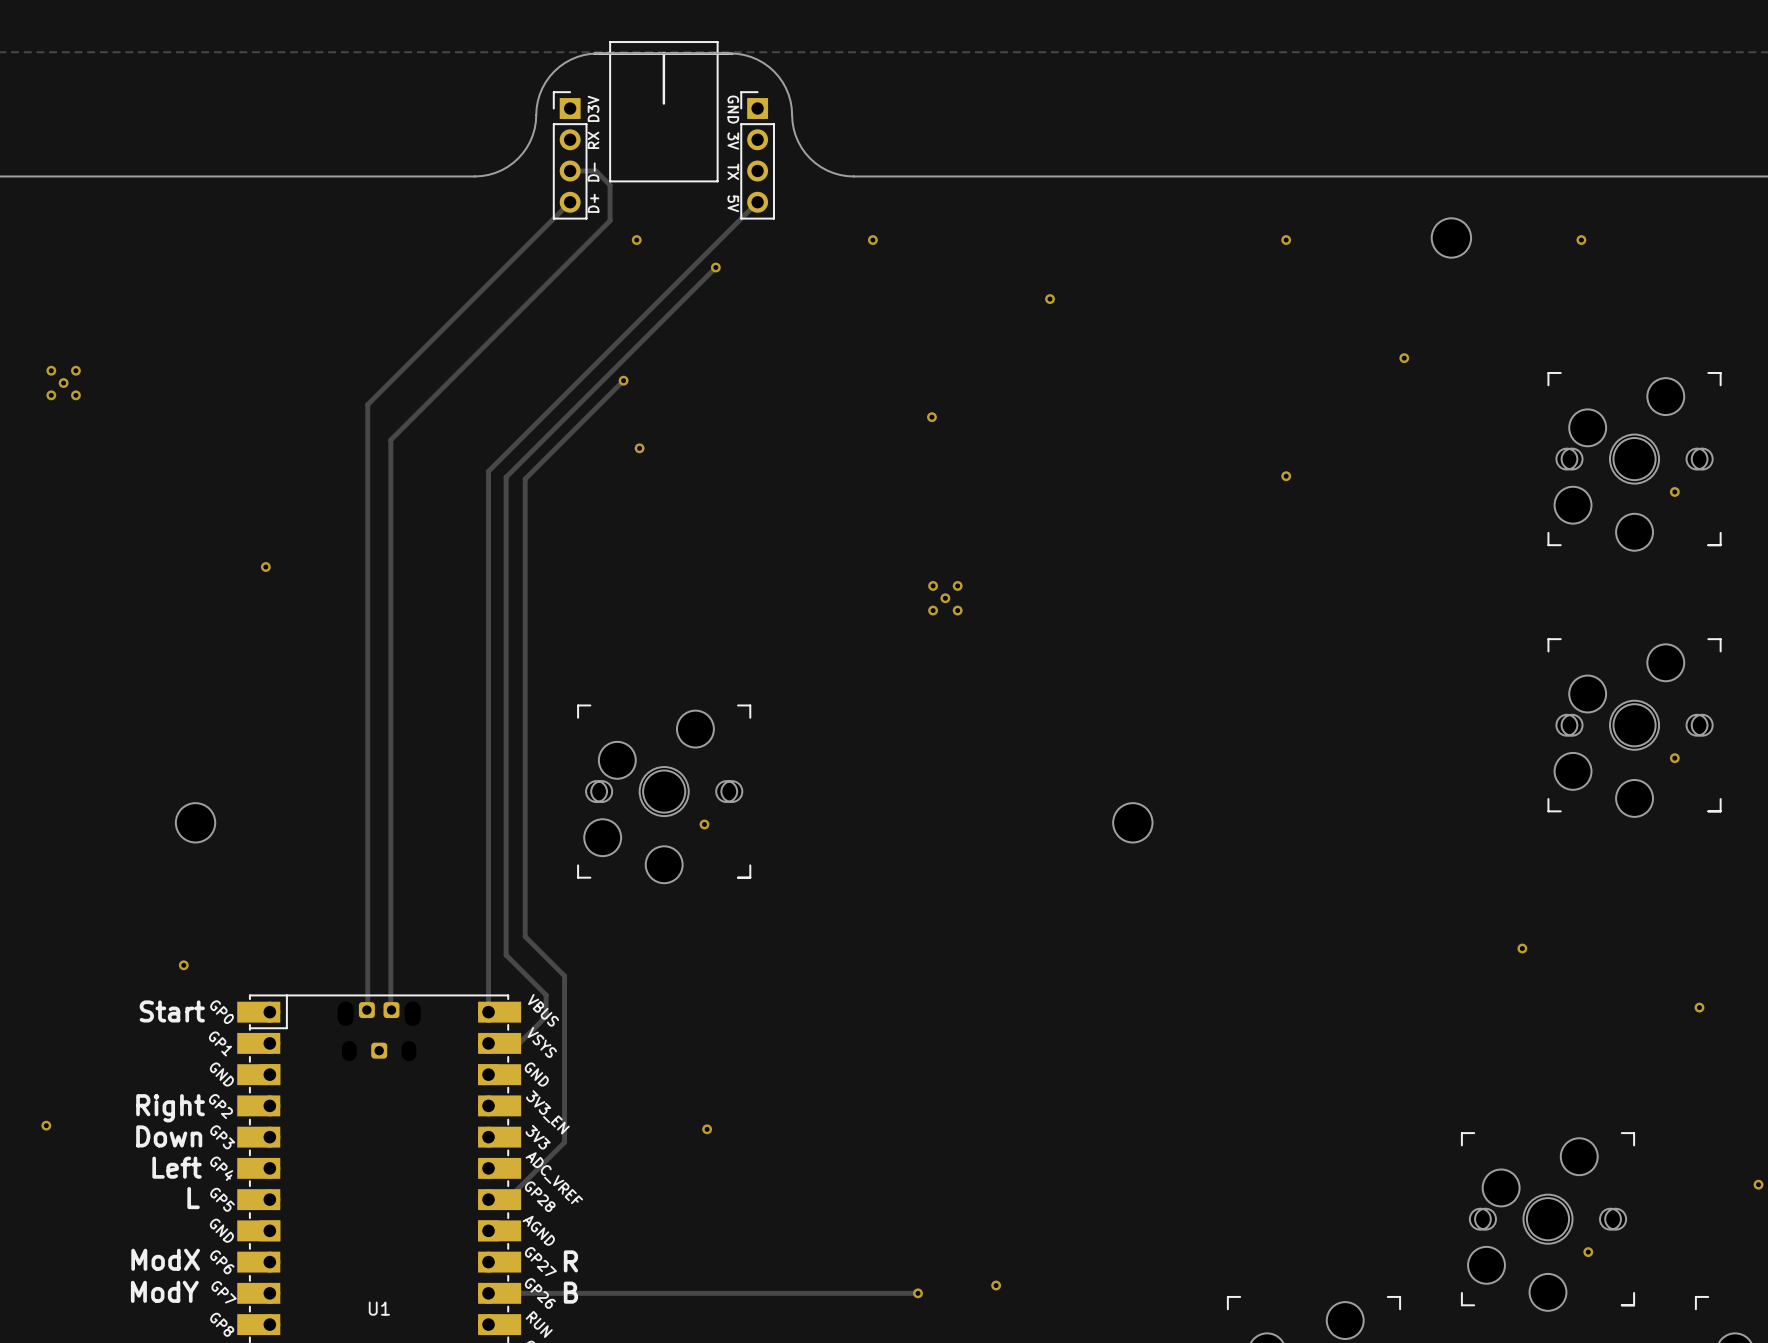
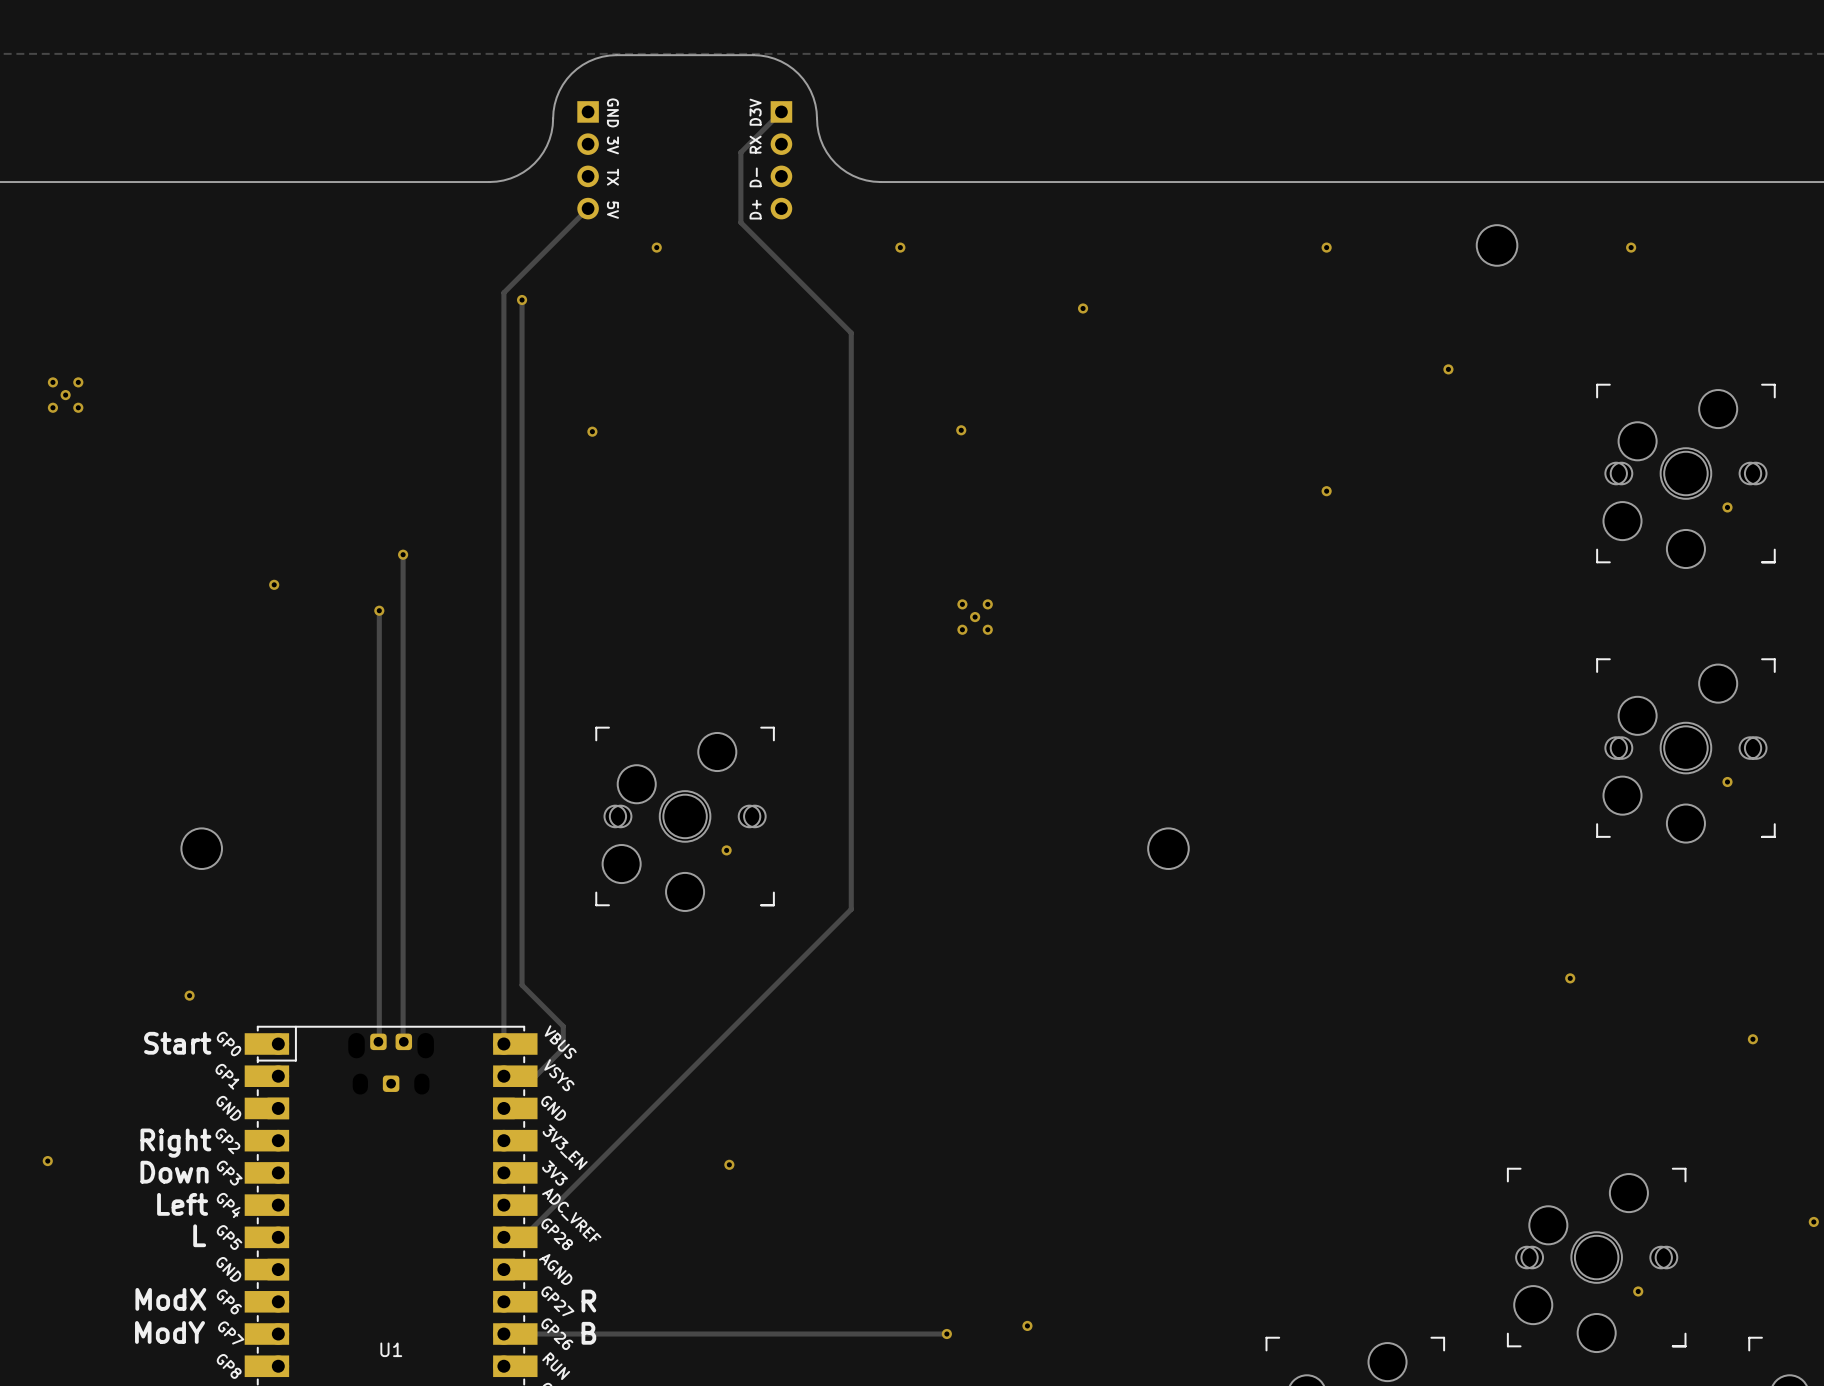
line: (610, 42) (717, 42) (717, 181) (610, 181) (610, 42) -> none
line: (594, 53) (732, 53) -> none
line: (663, 53) (663, 103) -> none
text: D3V (593, 108) -> GND (612, 112)
text: GND (733, 109) -> D3V (755, 112)
text: RX (593, 140) -> 3V (612, 145)
text: 3V (733, 141) -> RX (755, 144)
part side: top (570, 155) -> bottom (588, 160)
part side: top (757, 155) -> bottom (781, 160)
track: (570, 171) (595, 171) (610, 185) (610, 220) (390, 440) (390, 537) -> none
text: TX (733, 171) -> D- (755, 177)
text: D- (593, 172) -> TX (612, 177)
track: (757, 202) (488, 471) -> none
text: D+ (593, 203) -> 5V (612, 210)
text: 5V (733, 203) -> D+ (755, 209)
track: (715, 267) (506, 477) -> (522, 300) (522, 492)
via: (715, 267) -> none
track: (488, 283) (367, 404) (367, 592) -> (503, 292) (503, 486)
via: none -> (522, 300)
track: (623, 380) (525, 479) (525, 936) (564, 975) (564, 1142) -> (781, 111) (740, 152) (740, 222) (851, 333) (851, 909) (582, 1178)
via: (623, 380) -> none
via: none -> (592, 431)
via: (639, 448) -> none
via: none -> (403, 554)
via: none -> (379, 610)

